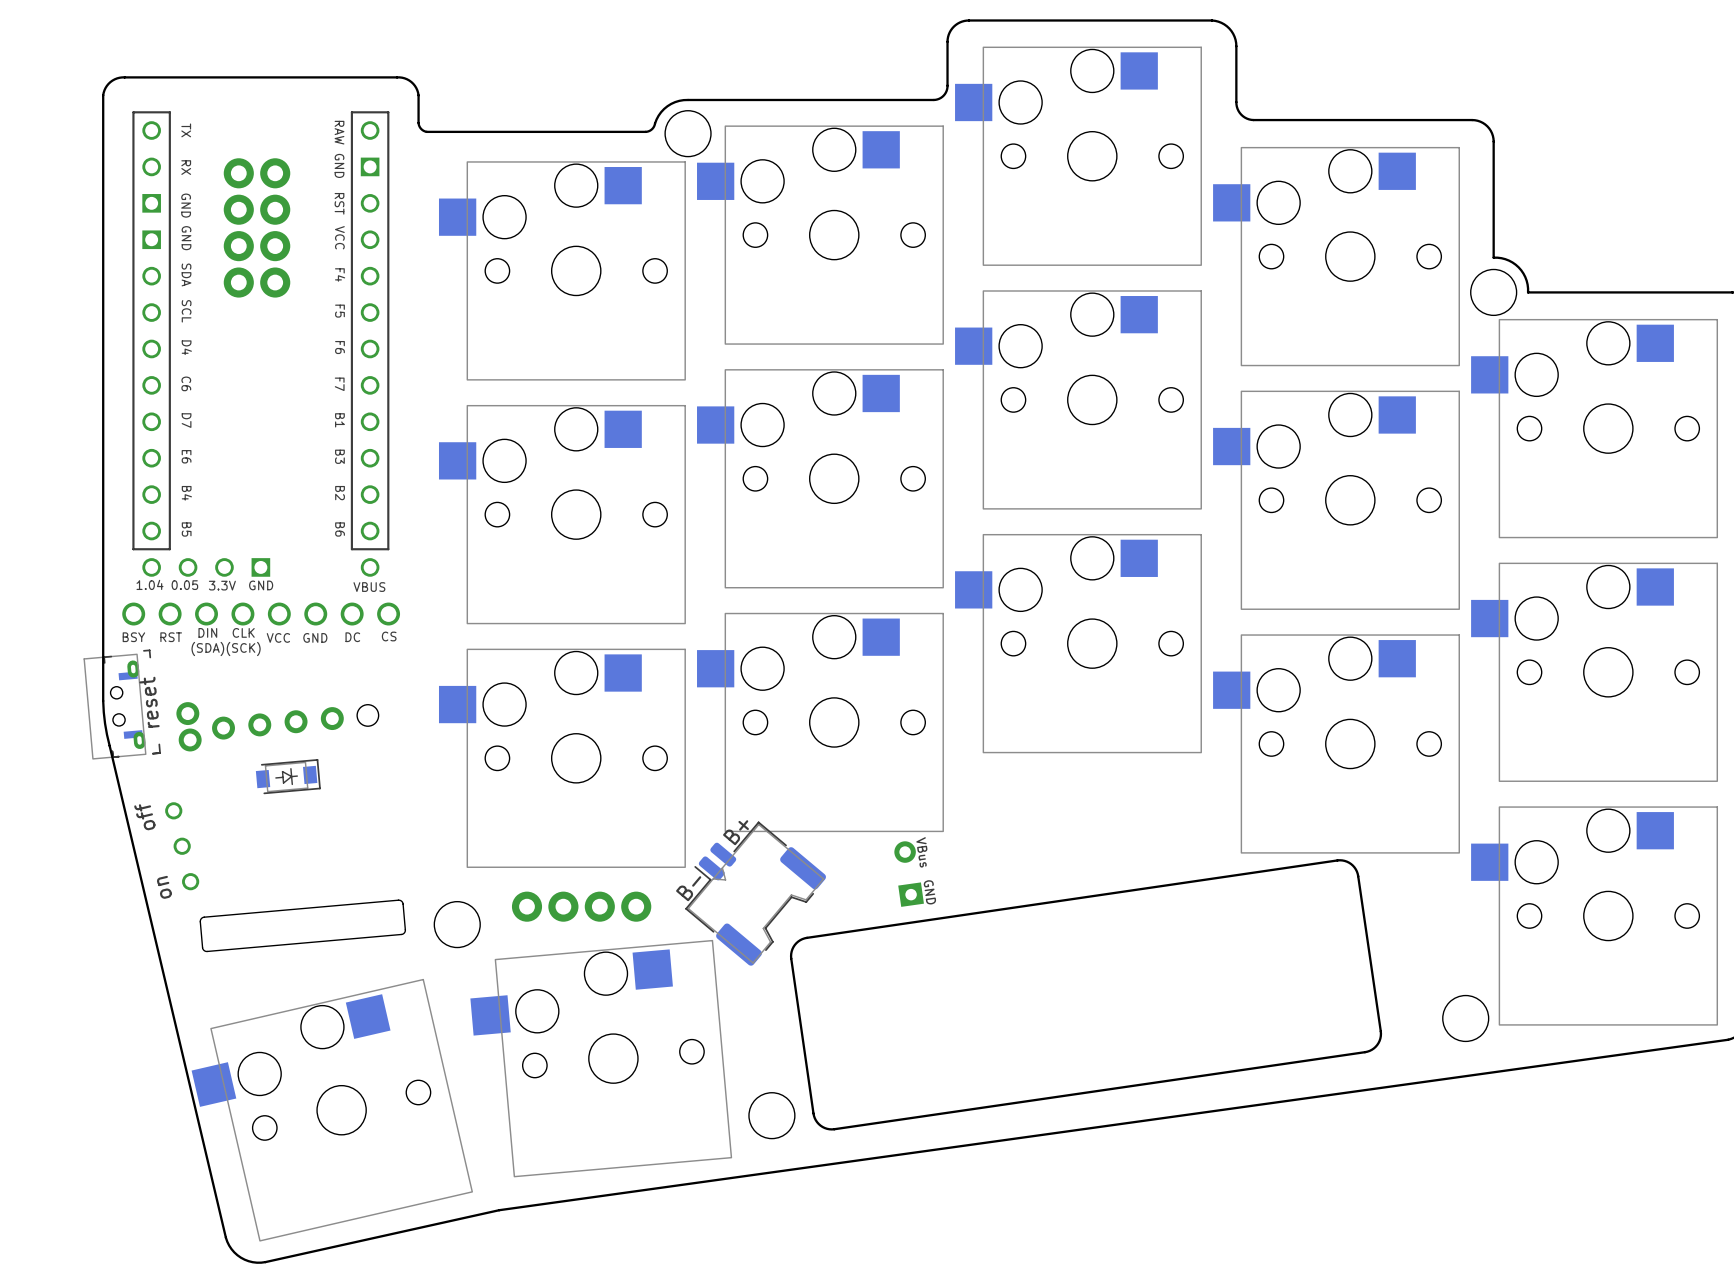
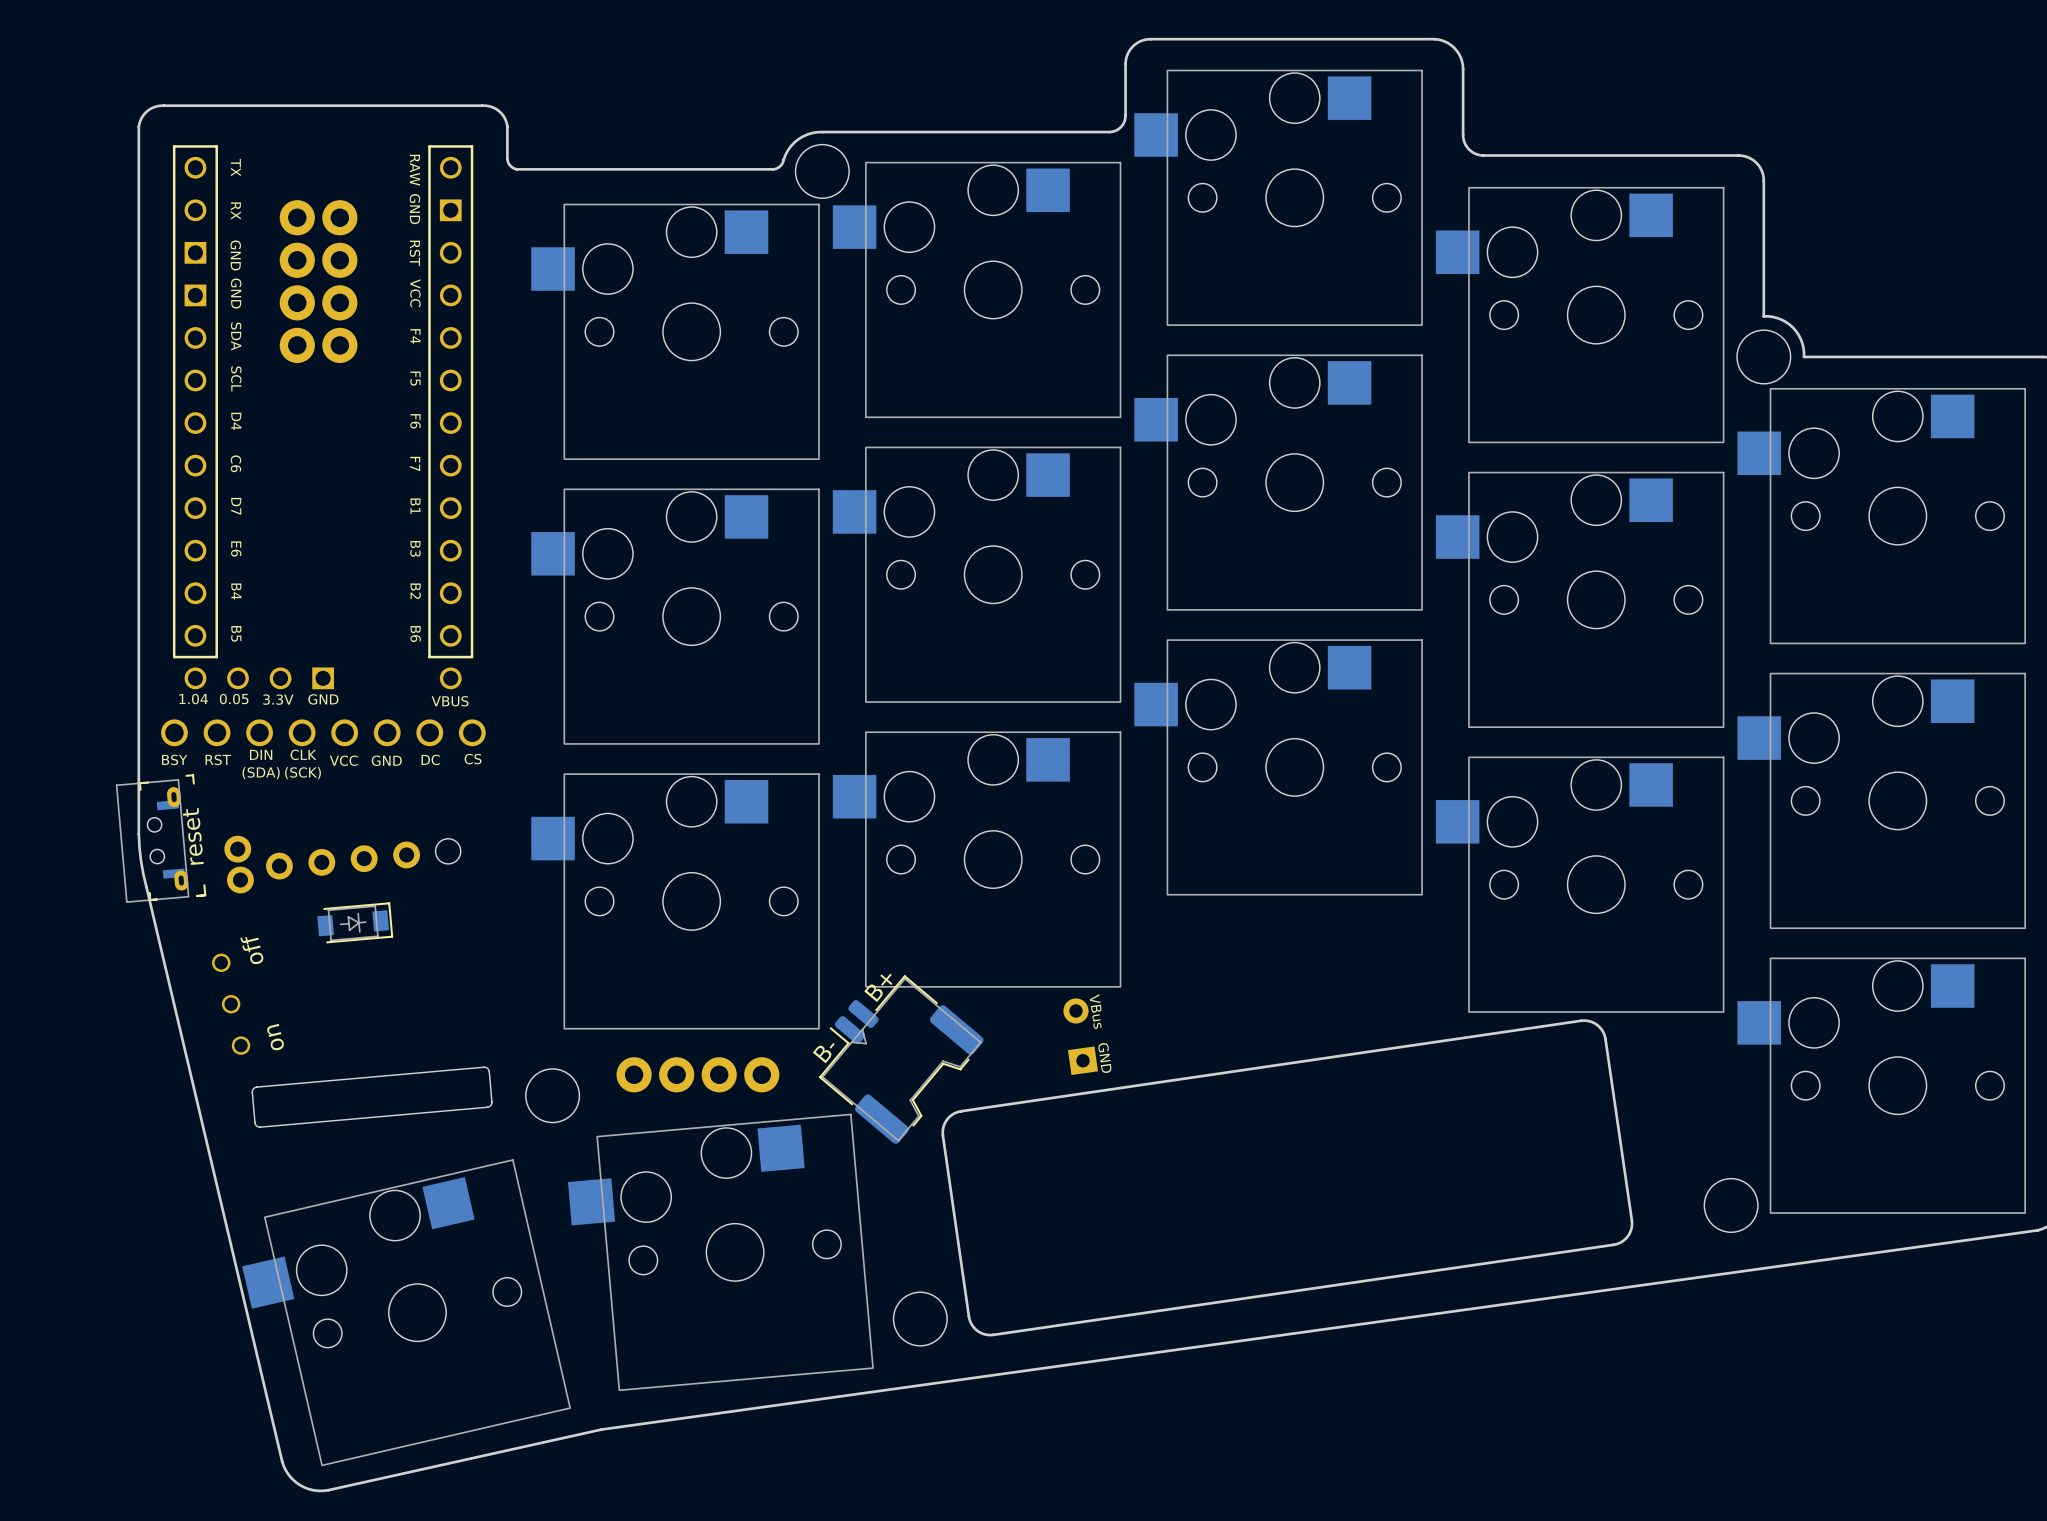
part footprint: [255, 759, 321, 795] -> [317, 902, 394, 944]
part footprint: [165, 802, 200, 891] -> [212, 953, 251, 1055]

